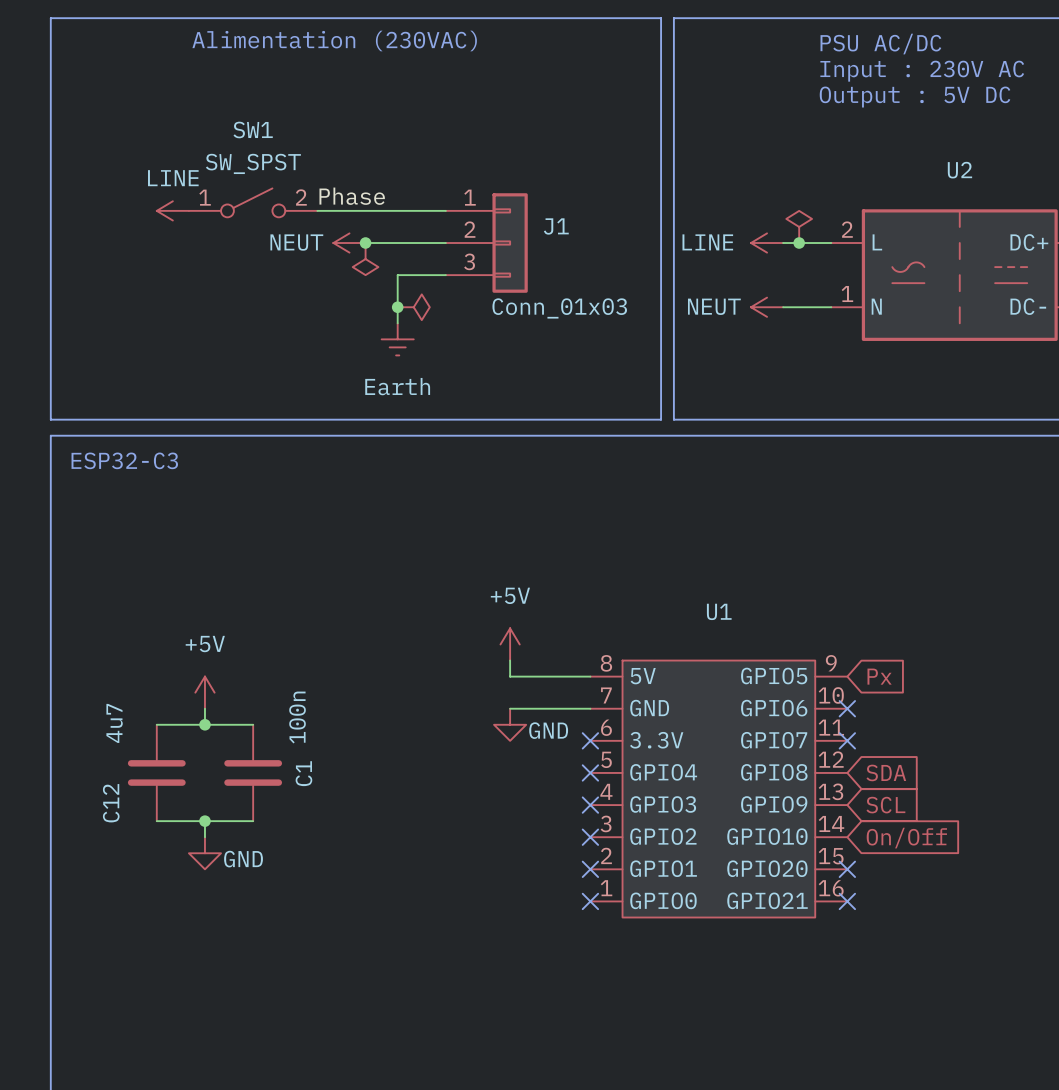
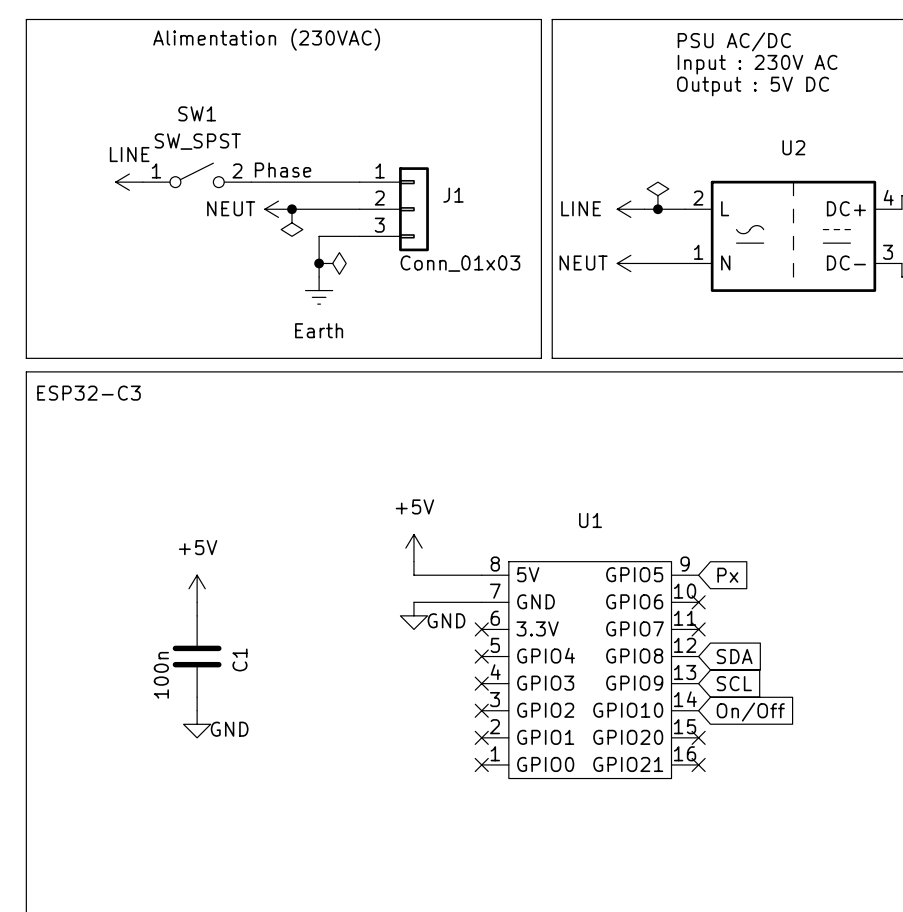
power symbol position: +5V (204, 692) -> +5V (197, 588)
wire: (204, 708) (204, 724) -> none
C1 value position: 100n (297, 717) -> 100n (161, 675)
wire: (156, 724) (253, 724) -> (197, 602) (197, 615)
junction: (204, 724) -> none
C12: 4u7 (156, 772) -> none
wire: (156, 821) (253, 821) -> (197, 710) (197, 697)
wire: (204, 821) (204, 837) -> none
junction: (204, 821) -> none
power symbol position: GND (204, 853) -> GND (197, 724)

